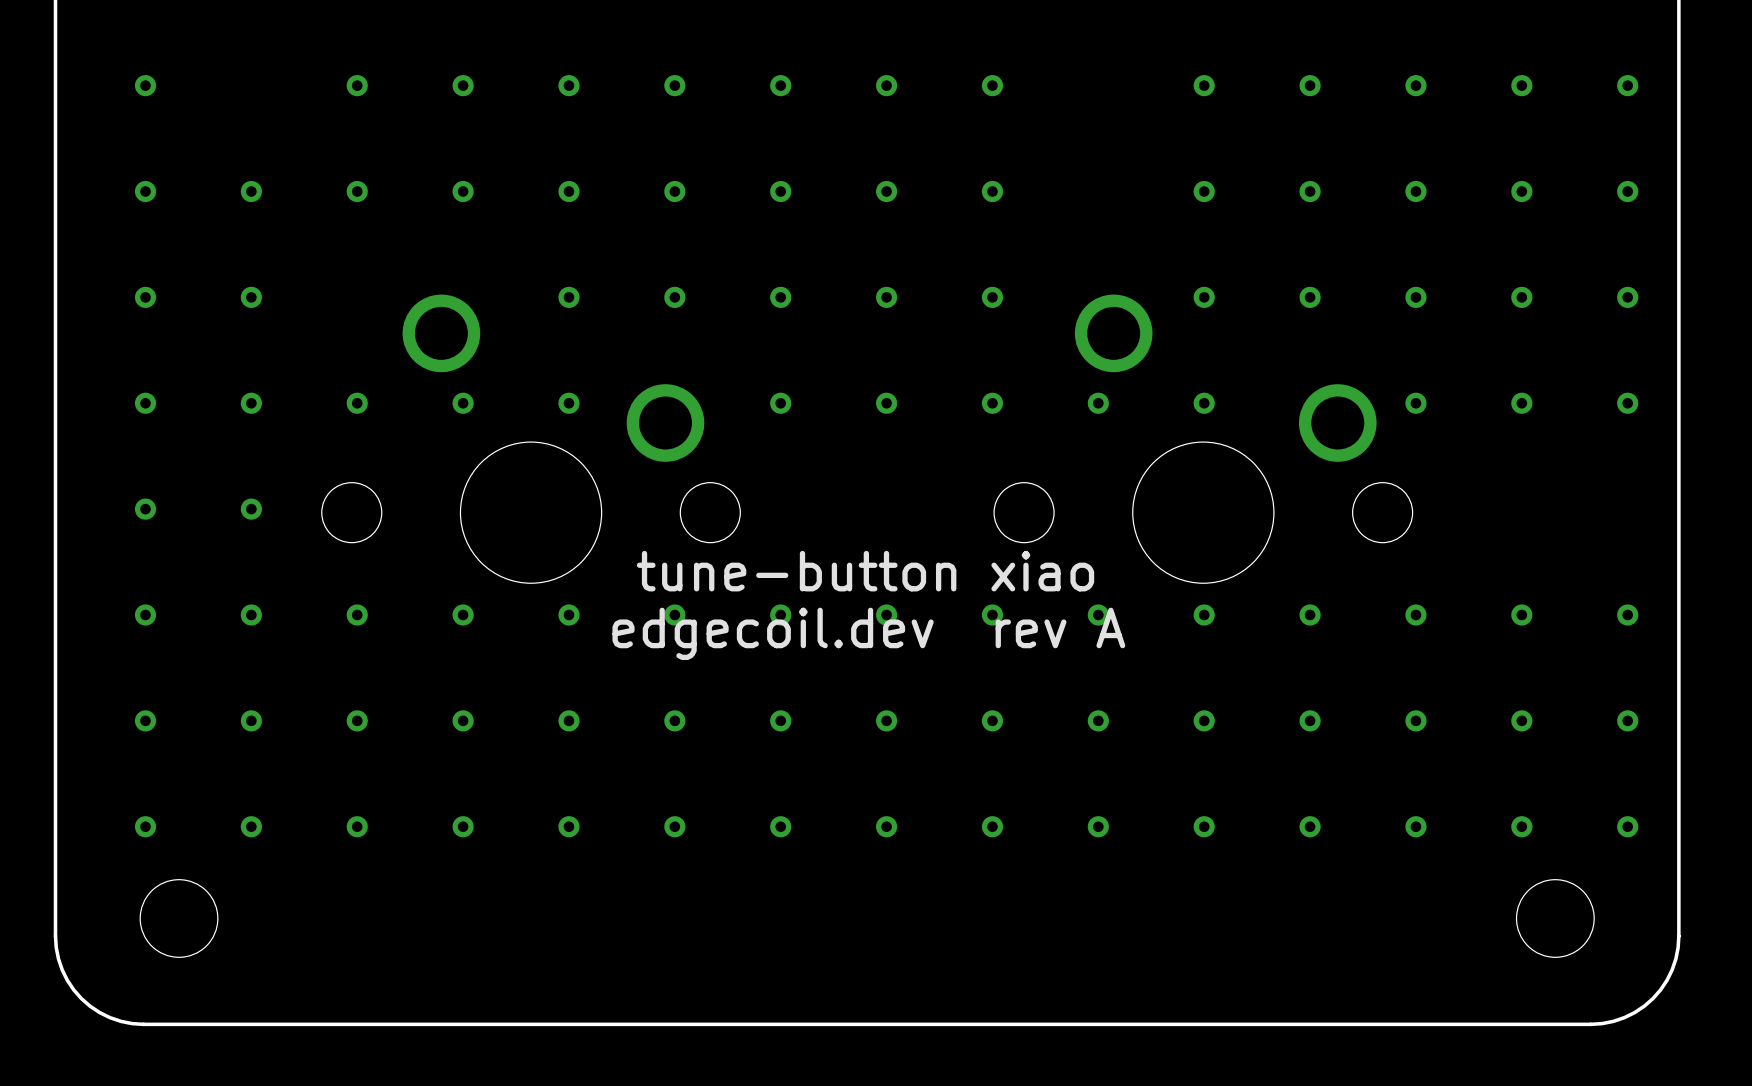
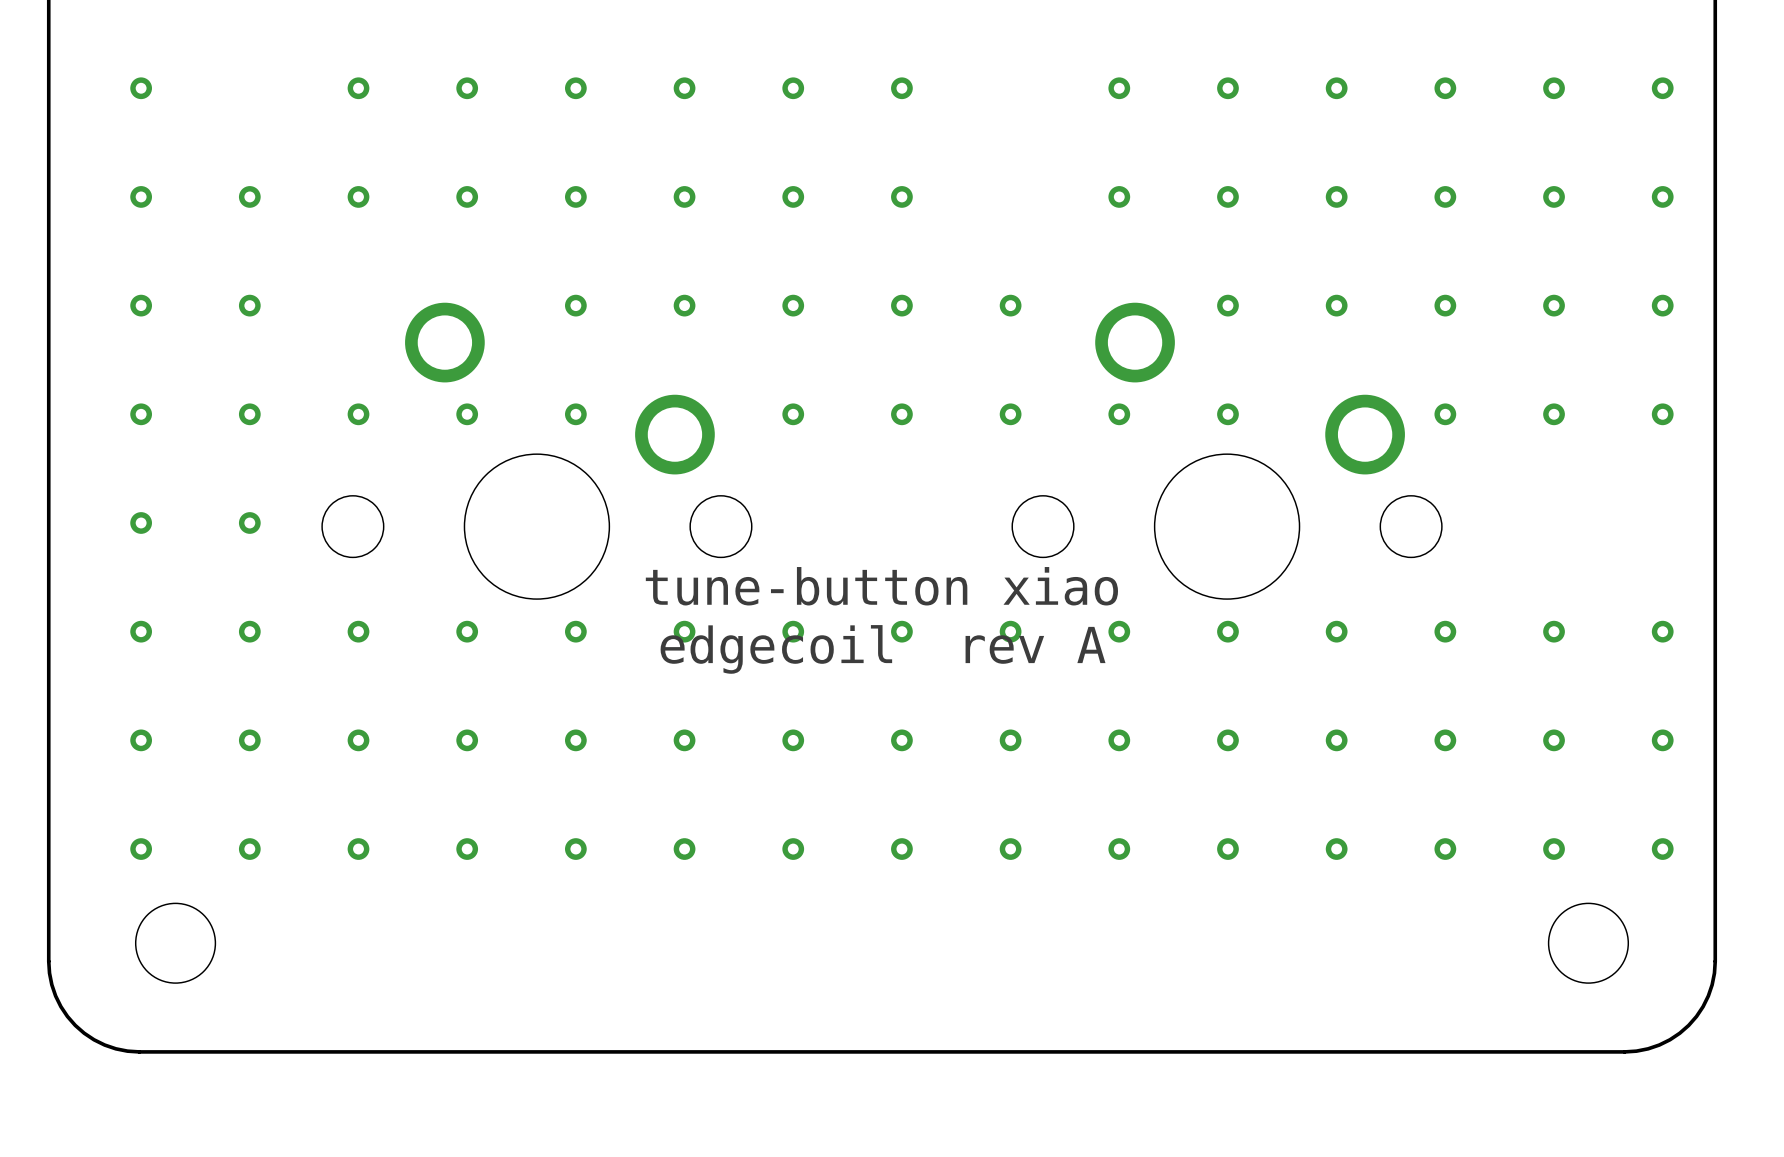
via: (992, 85) -> none
via: none -> (1119, 88)
via: (992, 191) -> none
via: none -> (1119, 196)
text: edgecoil.dev rev A (868, 633) -> edgecoil rev A (883, 649)

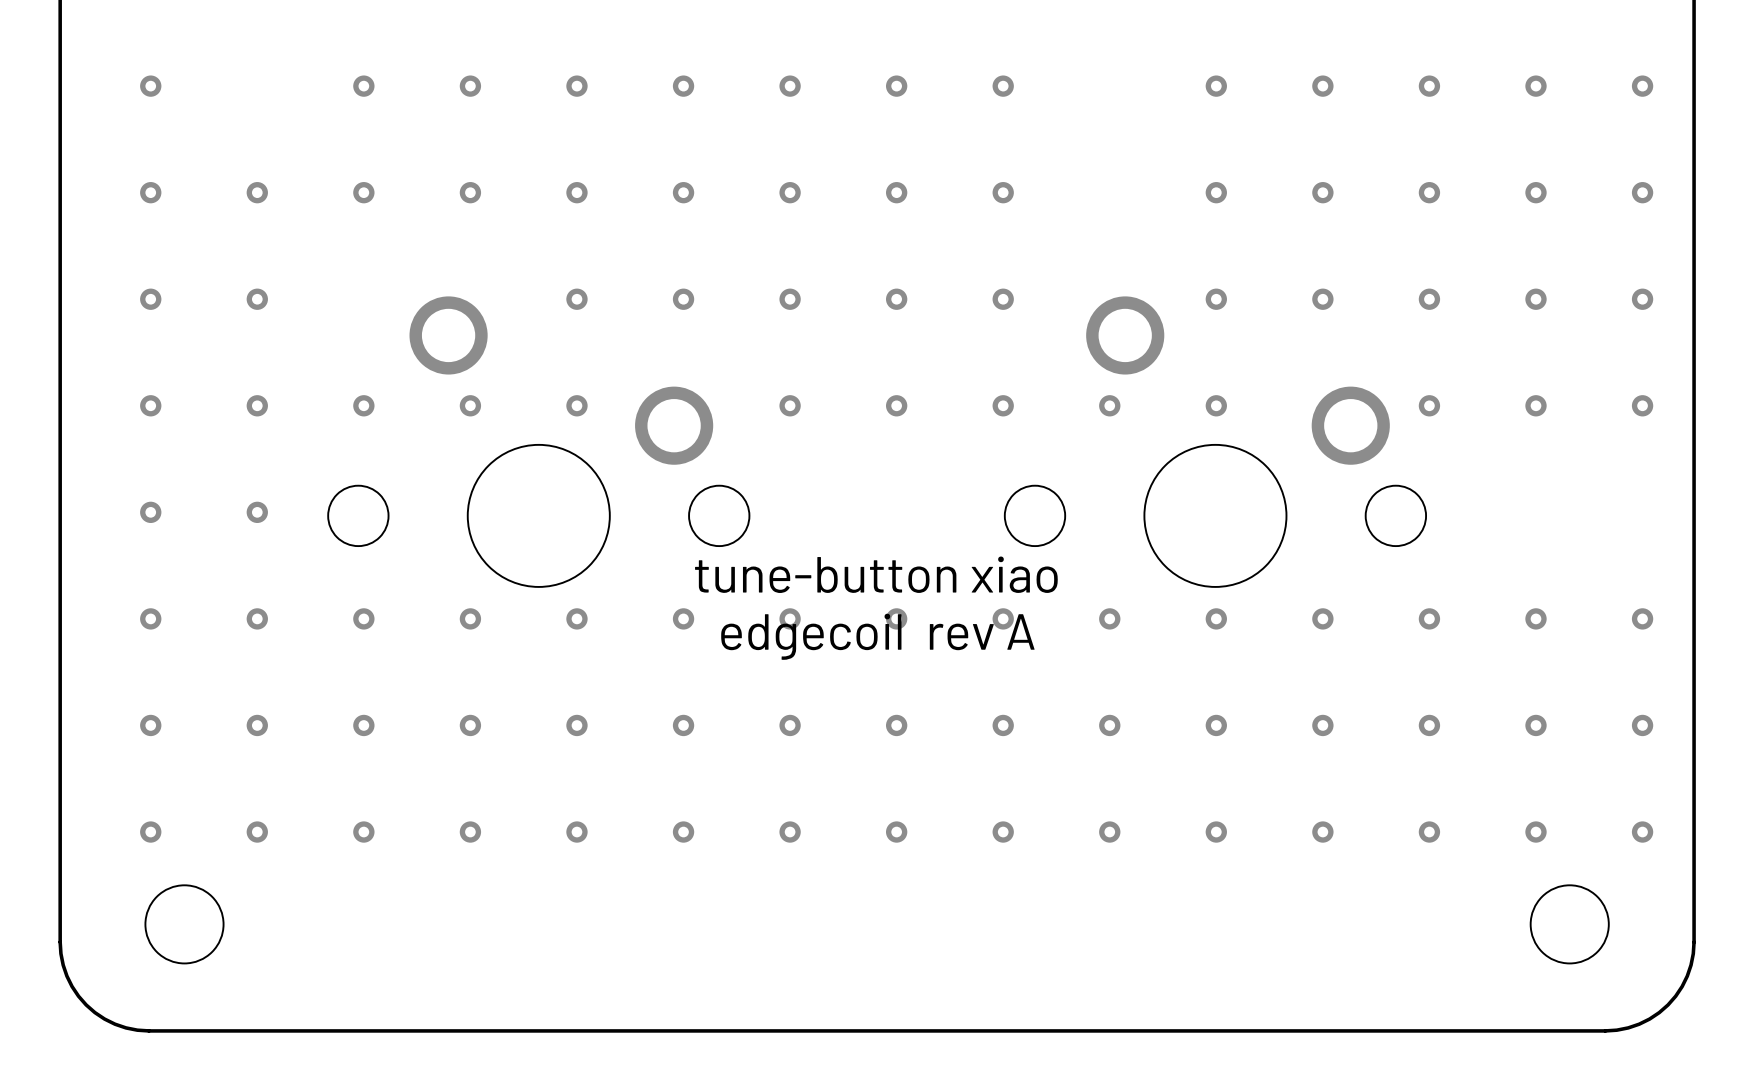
via: none -> (1003, 86)
via: (1119, 88) -> none
via: none -> (1003, 192)
via: (1119, 196) -> none

